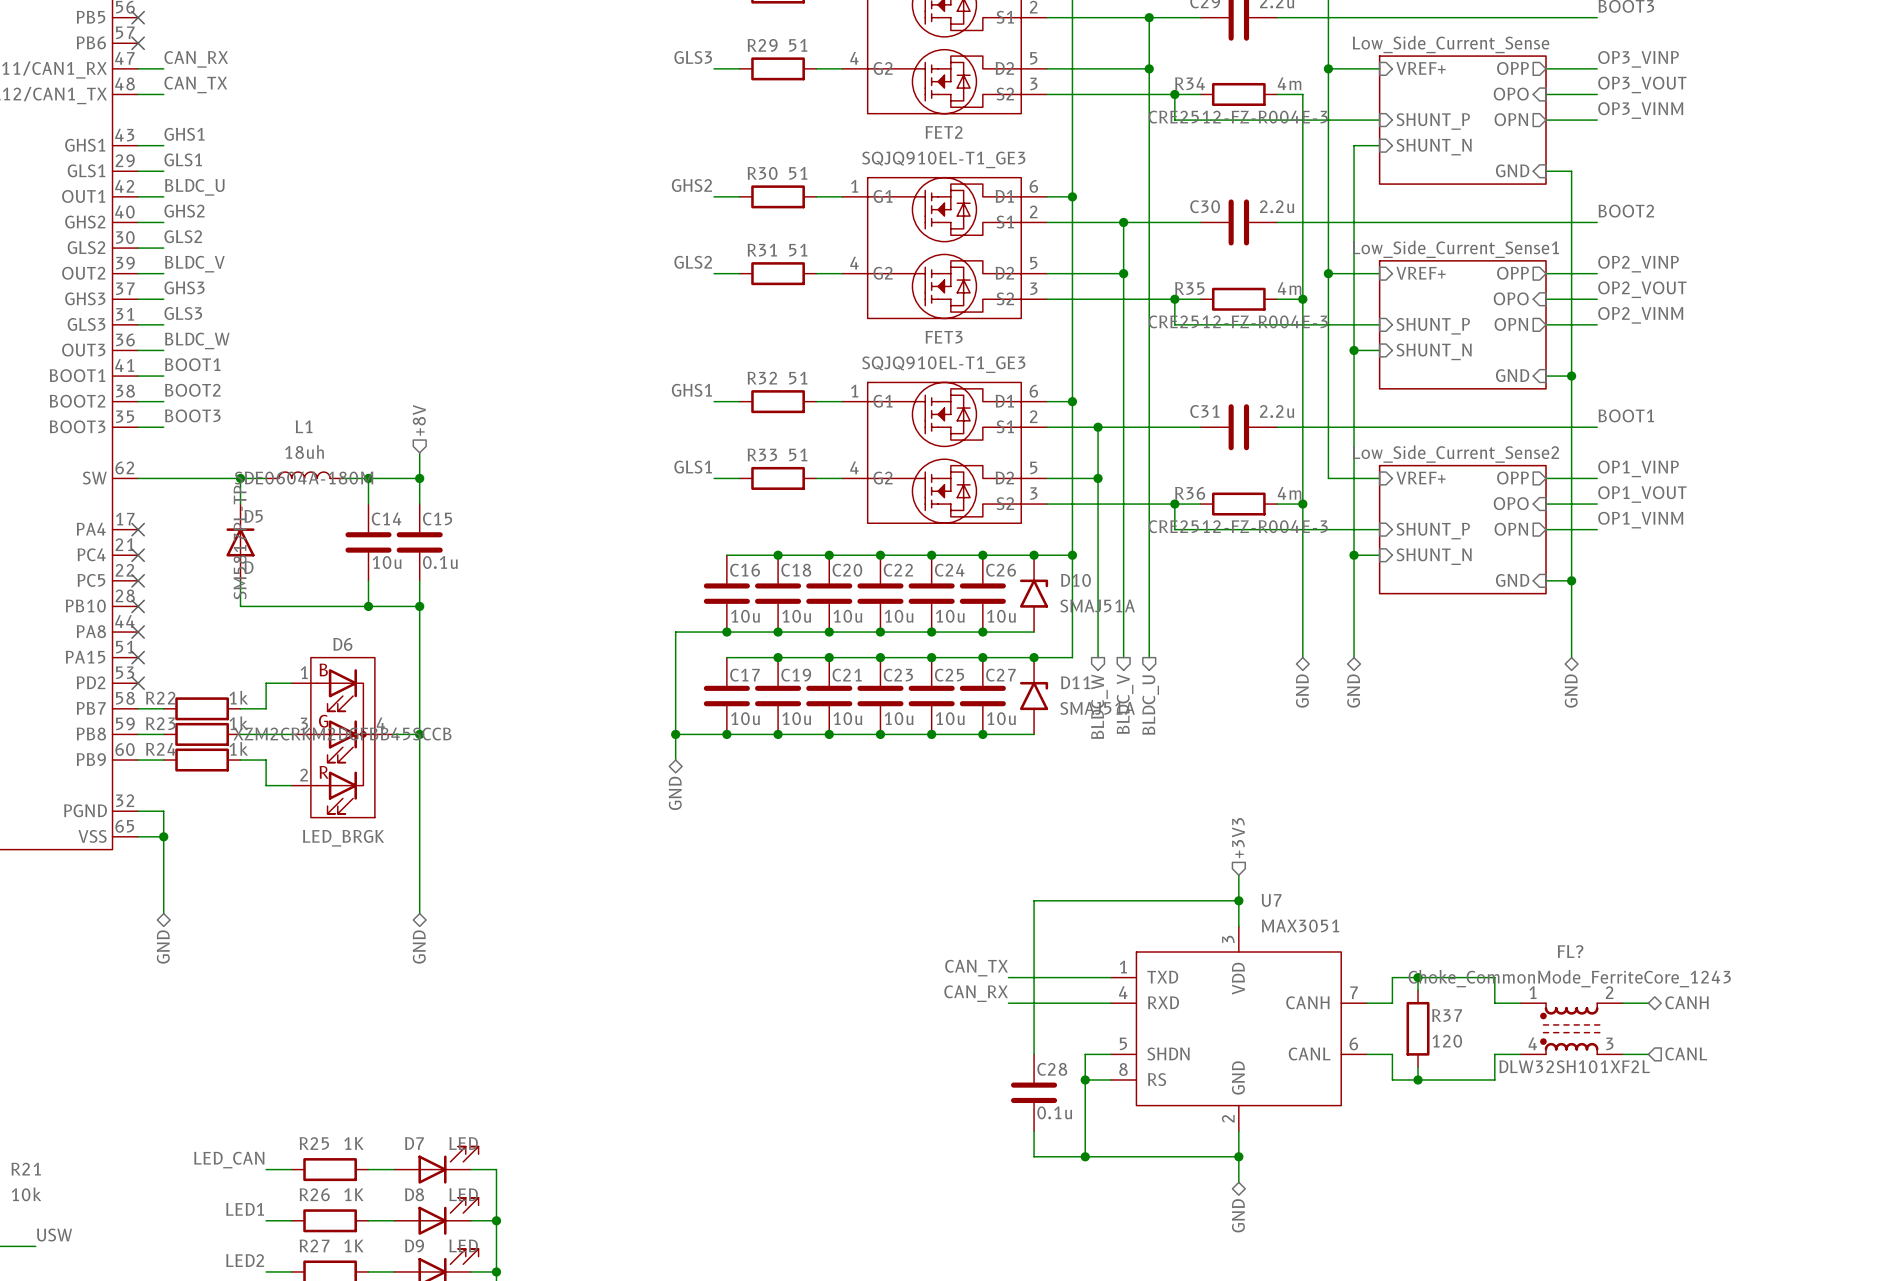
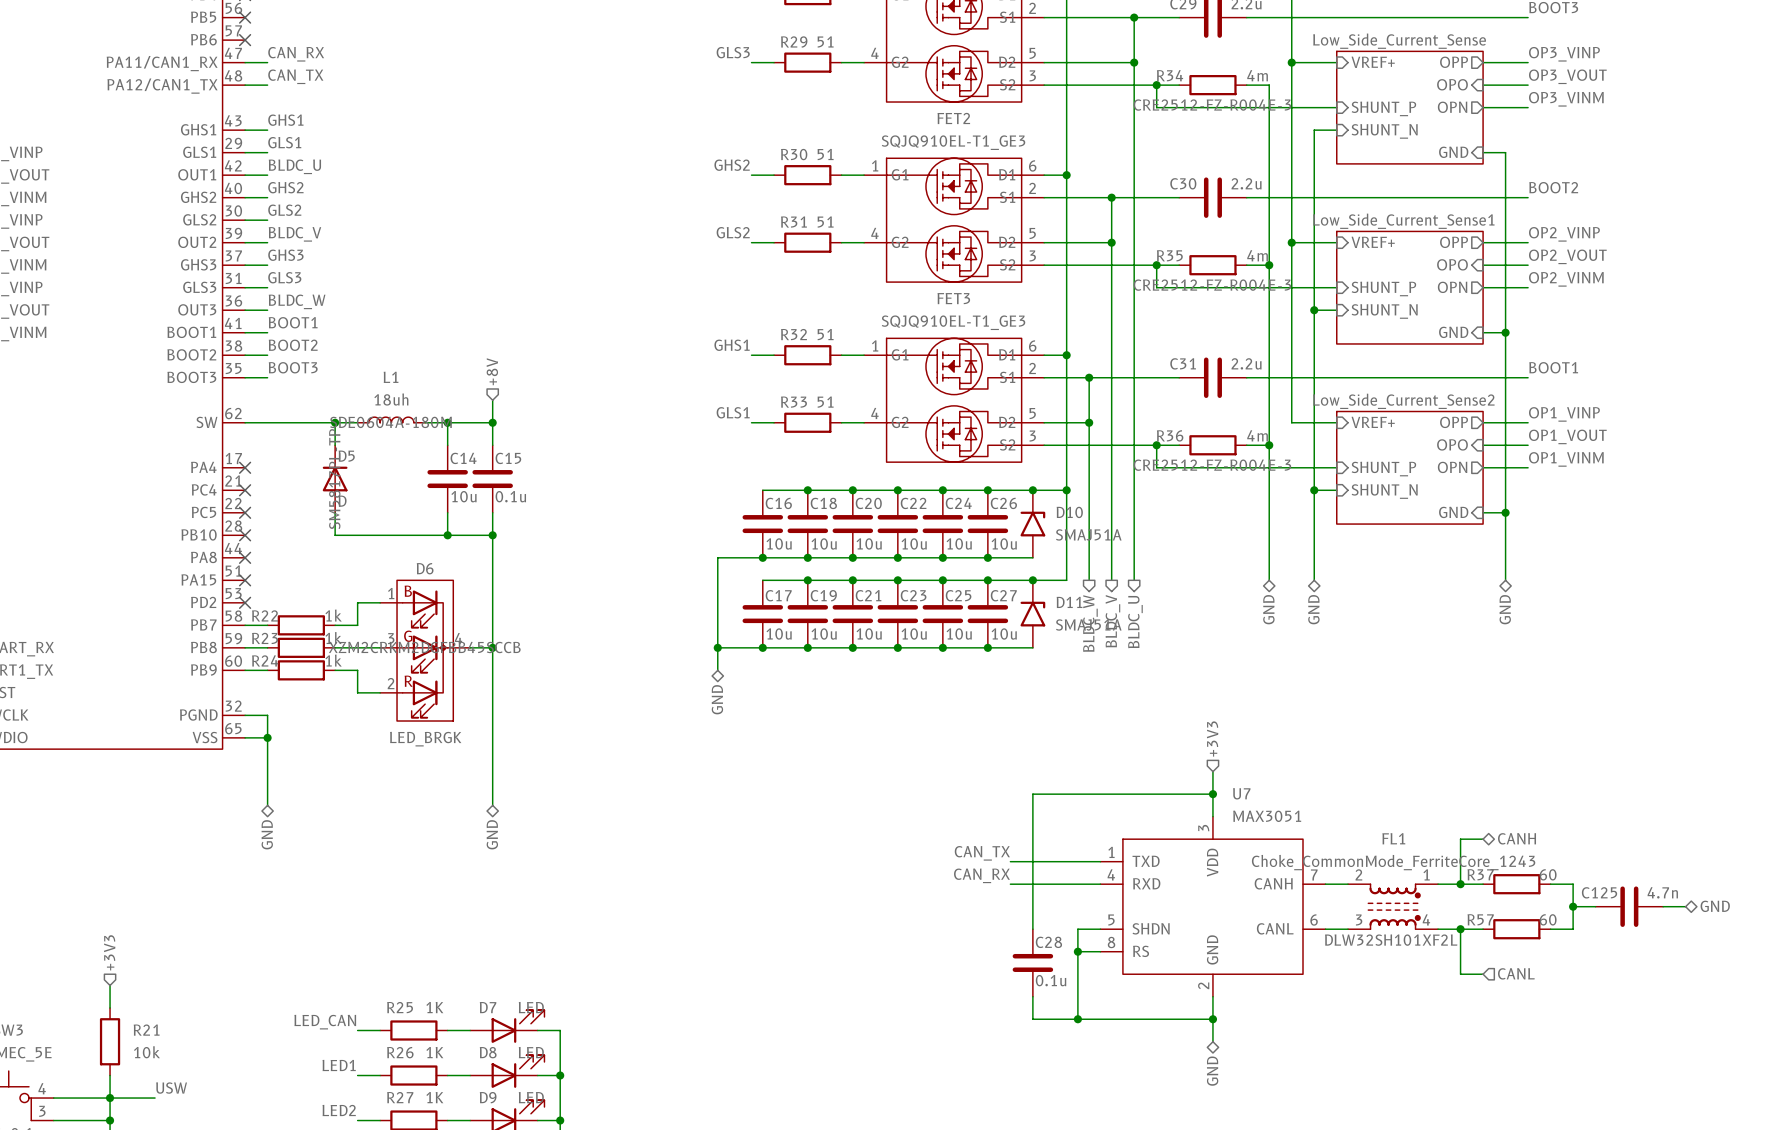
wire: none -> (1483, 839) (1460, 839) (1460, 884) (1483, 884)
wire: (1418, 977) (1418, 990) -> none
junction: (1418, 977) -> none
hierarchical label position: CANH (1687, 1002) -> CANH (1517, 838)
wire: (1392, 1003) (1392, 977) (1494, 977) (1494, 1003) -> none
junction: none -> (1460, 884)
wire: none -> (1573, 884) (1573, 929)
R37 name position: R37 (1447, 1015) -> R37 (1480, 874)
R37 rotation: 0° (1418, 1028) -> 90° clockwise (1516, 884)
R37 position: (1418, 1028) -> (1516, 884)
FL1: none -> Choke_CommonMode_FerriteCore_1243 (1393, 906)
FL?: Choke_CommonMode_FerriteCore_1243 (1571, 1028) -> none
wire: none -> (1573, 906) (1595, 906)
junction: none -> (1573, 906)
C125: none -> 4.7n (1629, 906)
wire: none -> (1663, 906) (1685, 906)
hierarchical label: none -> GND (1715, 906)
R37 value: 120 (1447, 1041) -> 60 (1548, 874)
hierarchical label position: CANL (1686, 1053) -> CANL (1516, 973)
wire: (1392, 1054) (1392, 1079) (1494, 1079) (1494, 1054) -> none
junction: none -> (1460, 929)
wire: none -> (1483, 929) (1460, 929) (1460, 974) (1483, 974)
R57: none -> 60 (1516, 929)
wire: (1418, 1067) (1418, 1079) -> none
junction: (1418, 1079) -> none

